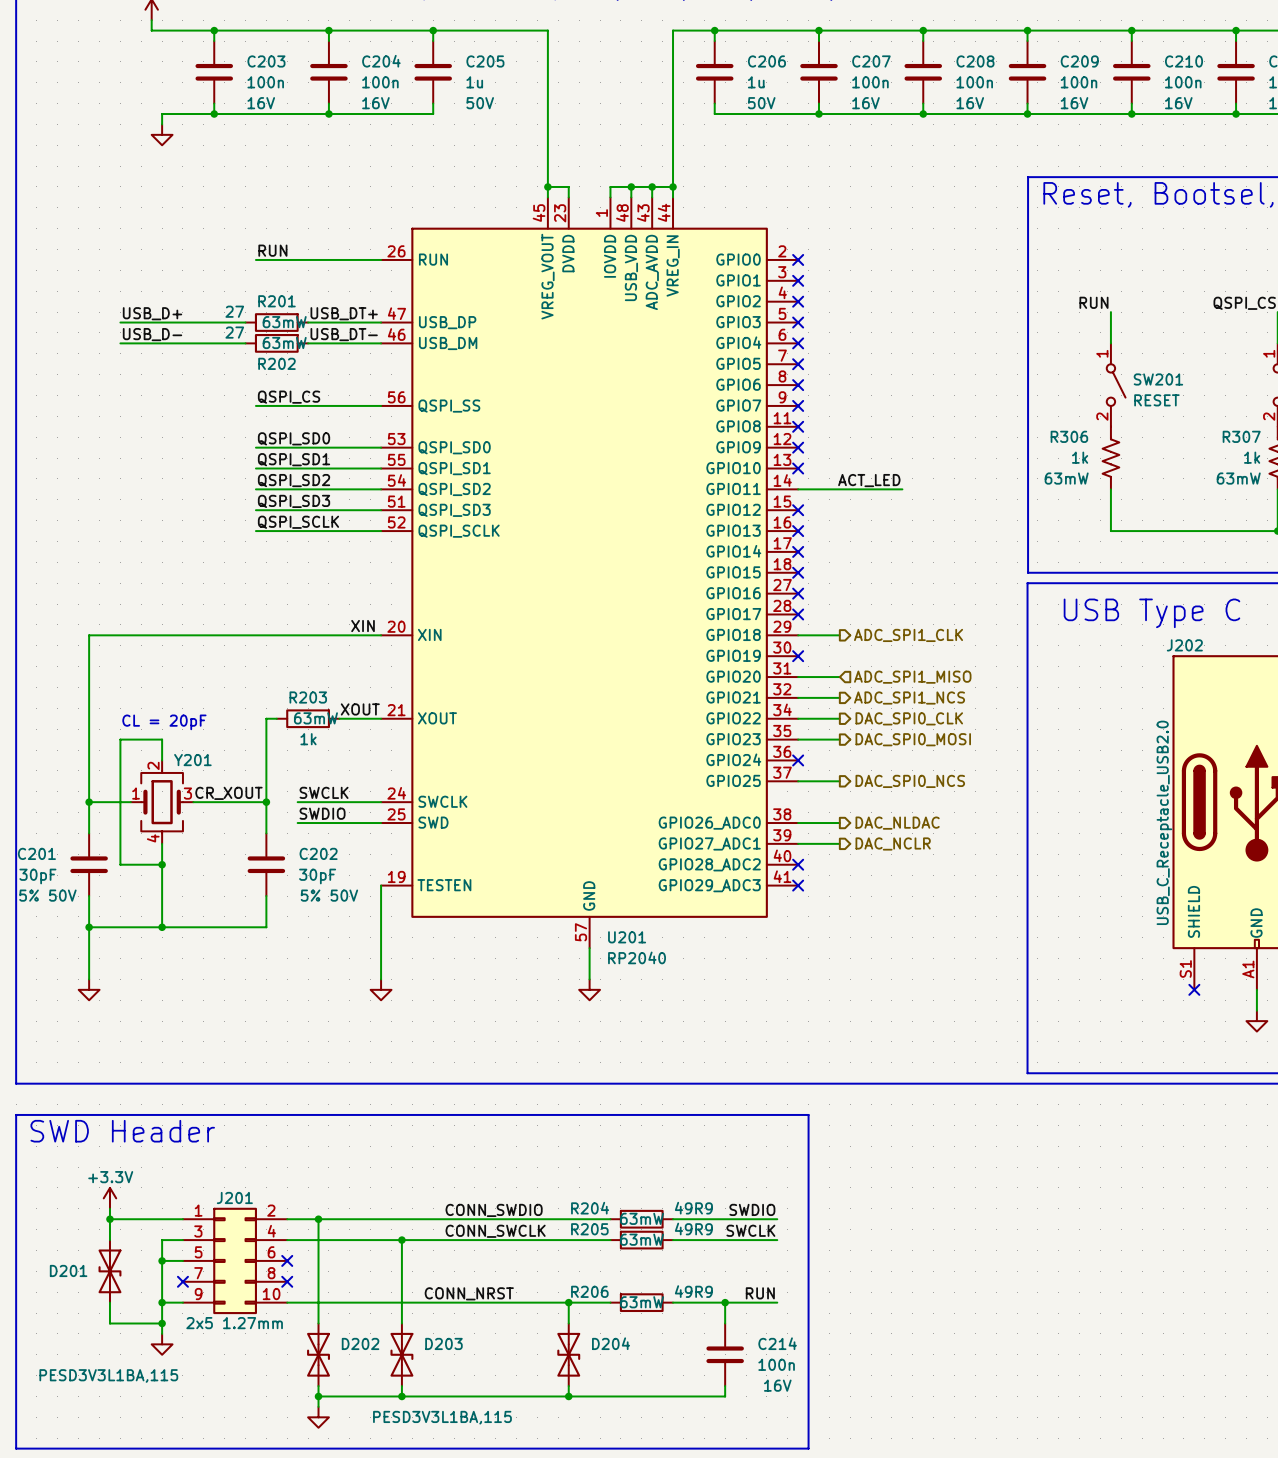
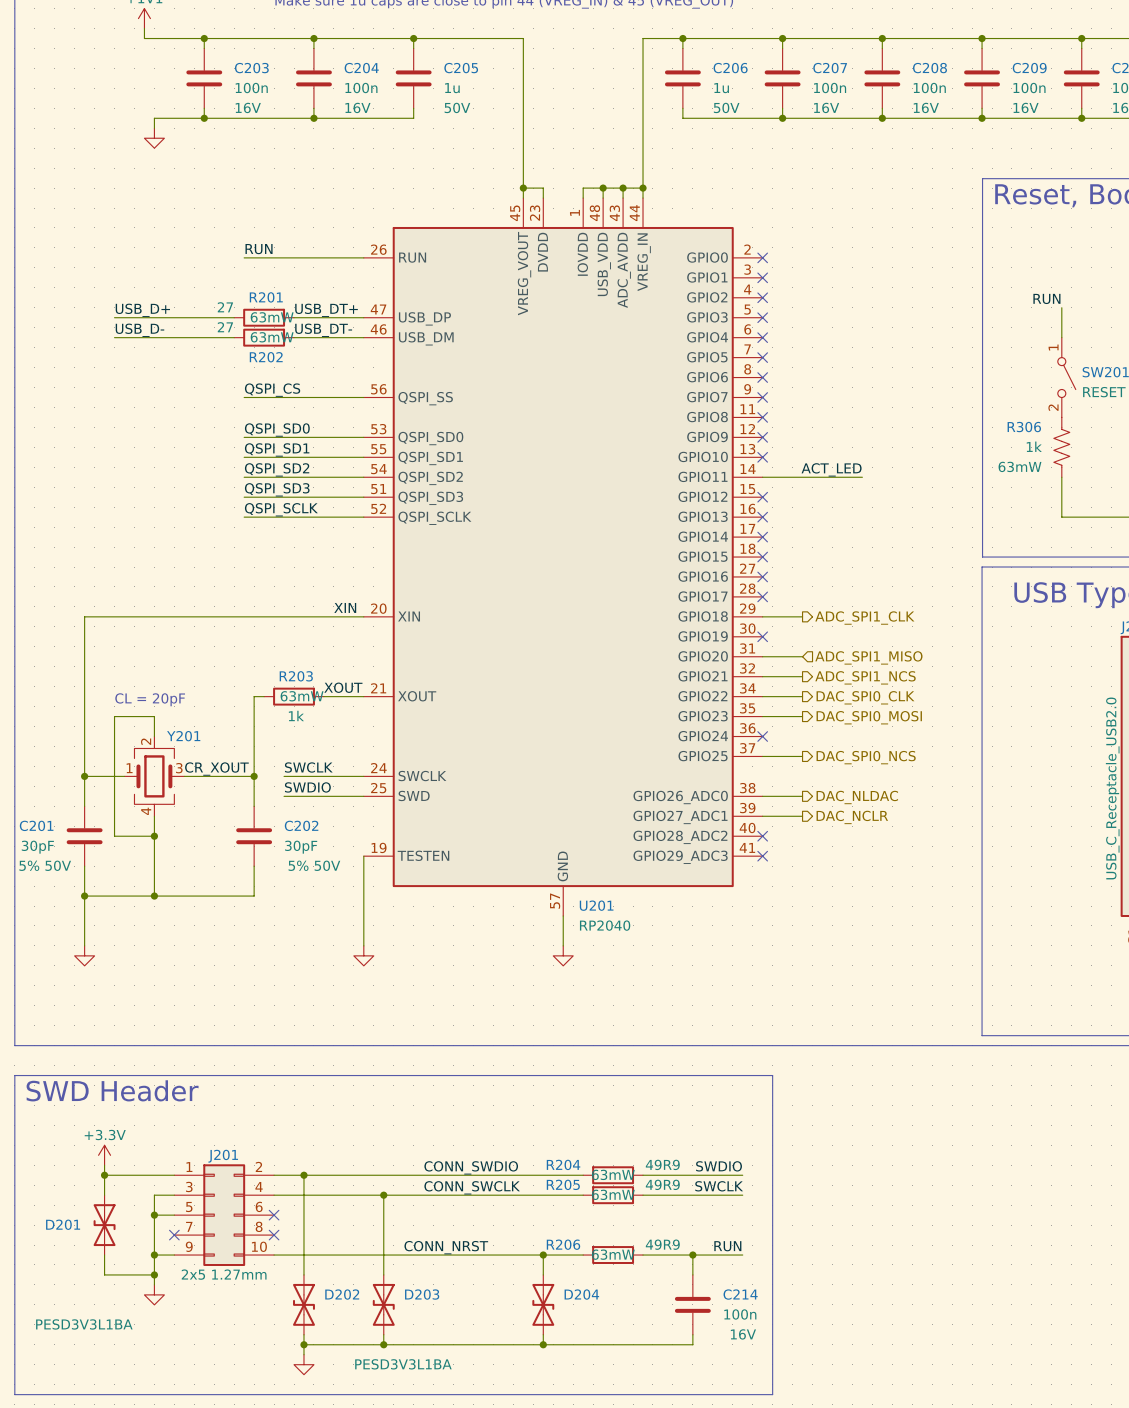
D201 value: PESD3V3L1BA,115 (108, 1375) -> PESD3V3L1BA (84, 1324)
D202 value: PESD3V3L1BA,115 (442, 1417) -> PESD3V3L1BA (403, 1364)

